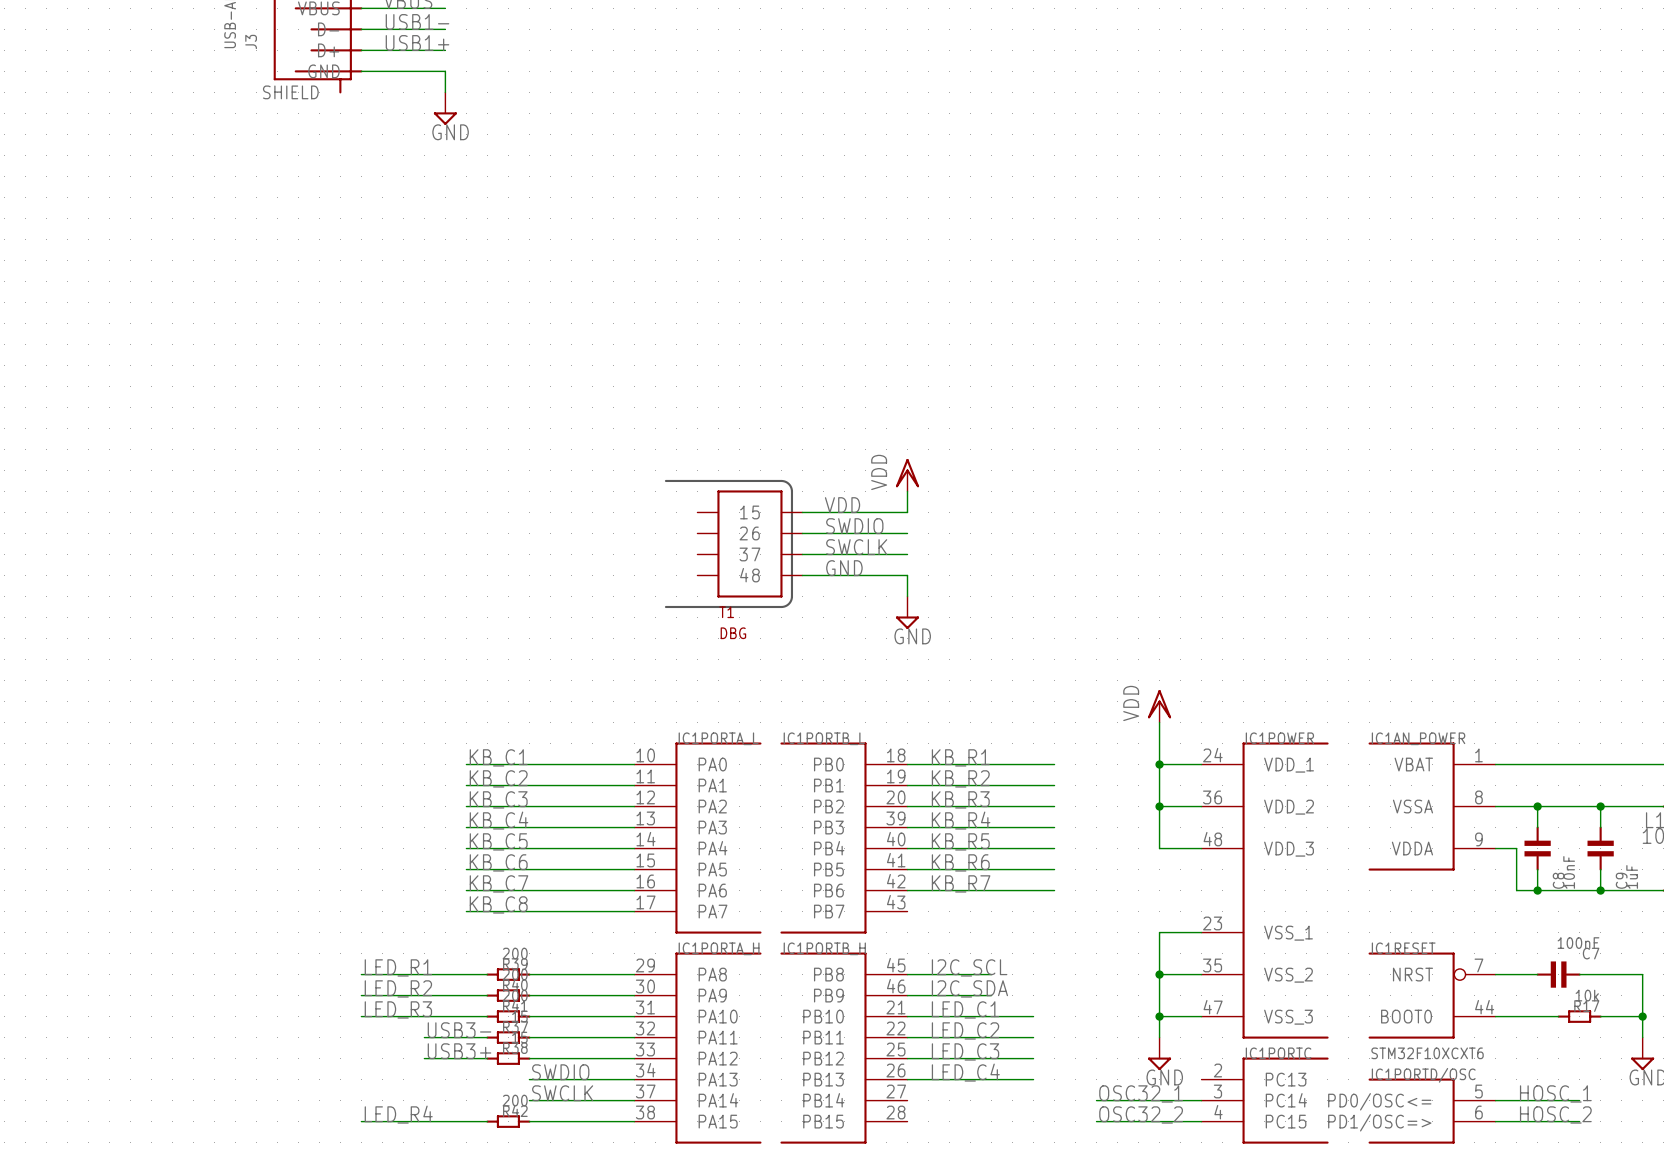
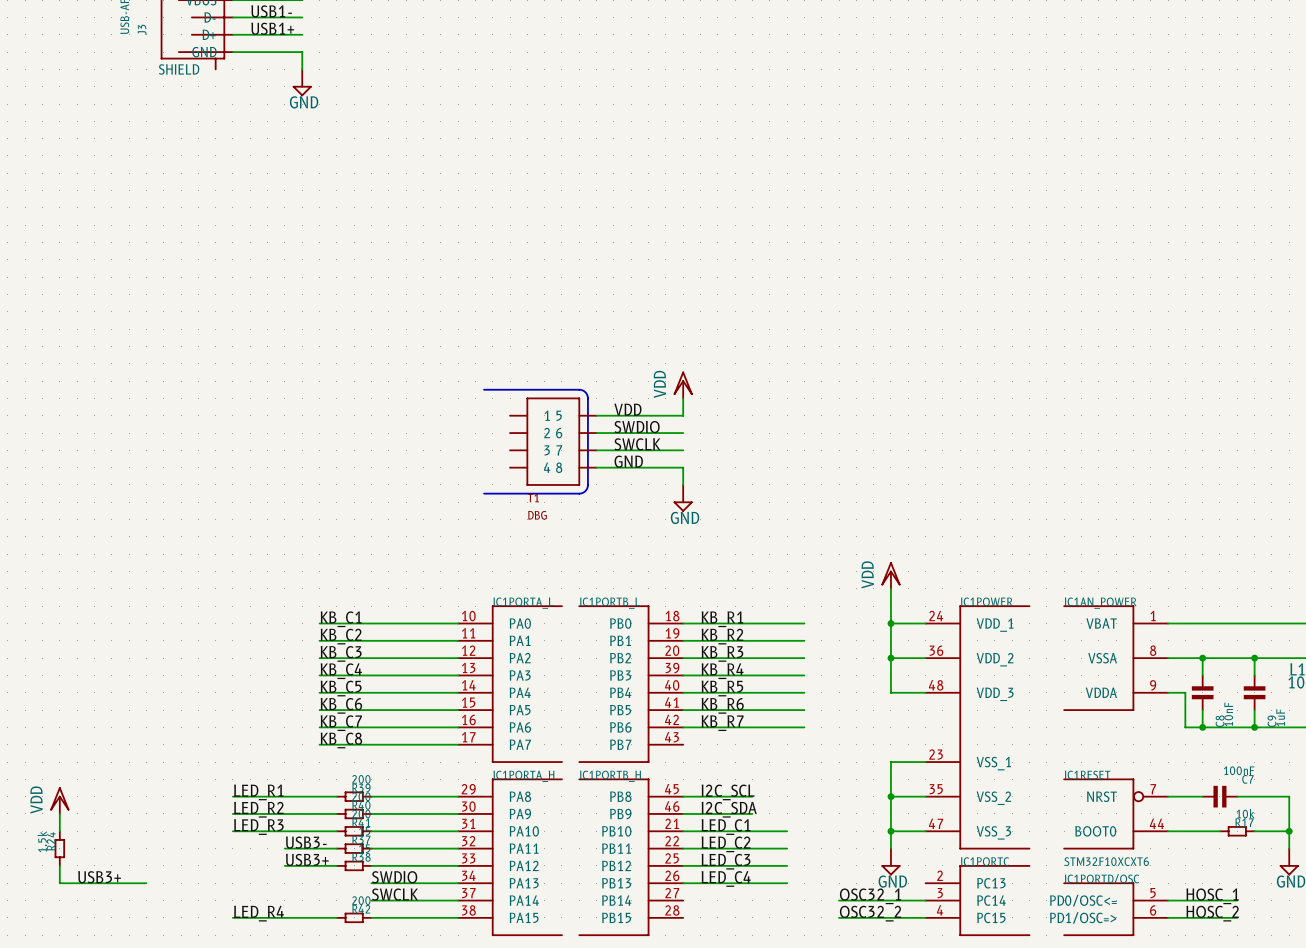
power symbol: none -> VDD (59, 800)
wire: none -> (59, 813) (59, 831)
R24: none -> 1.5k (59, 848)
wire: none -> (59, 865) (59, 883) (146, 883)
label: none -> USB3+ (99, 877)

